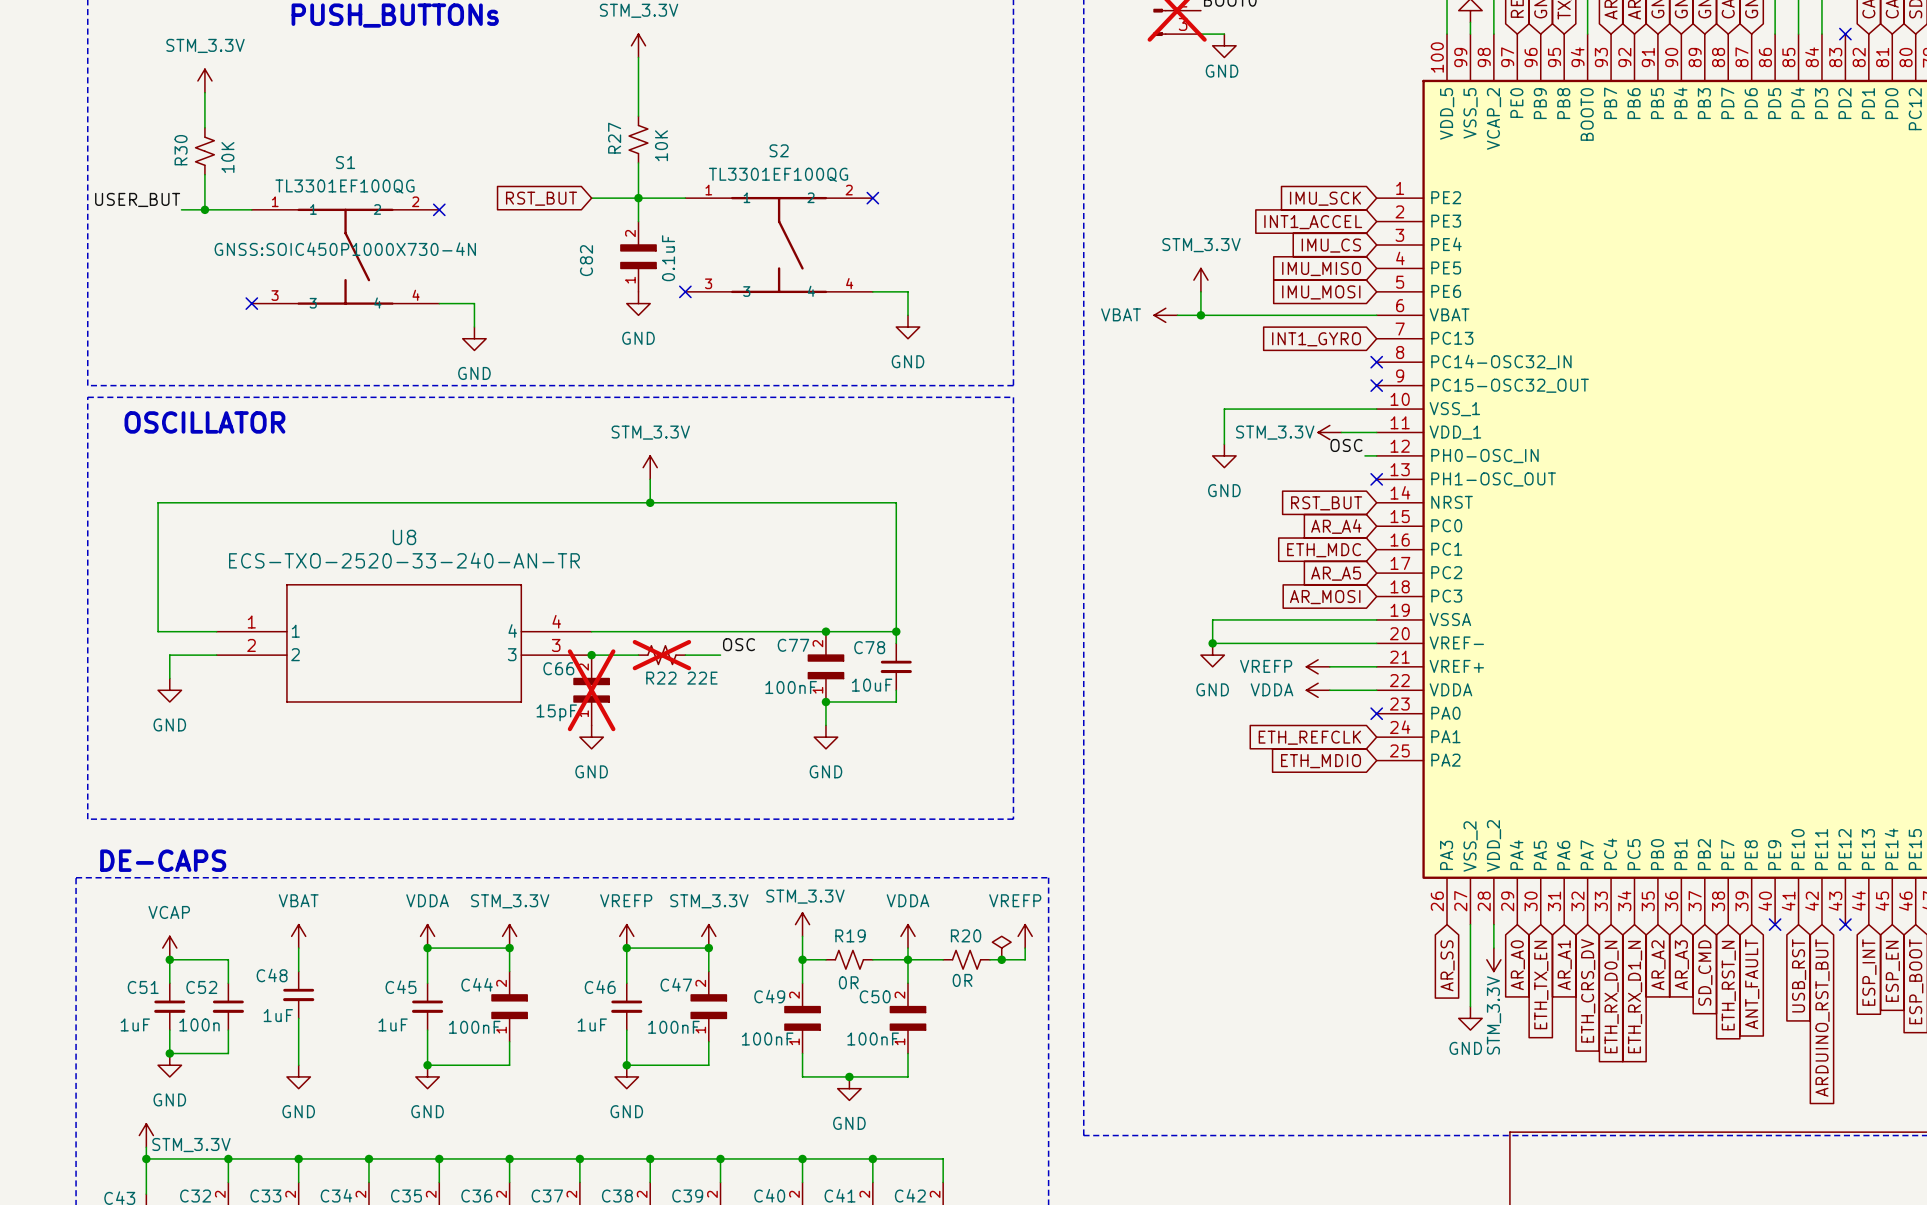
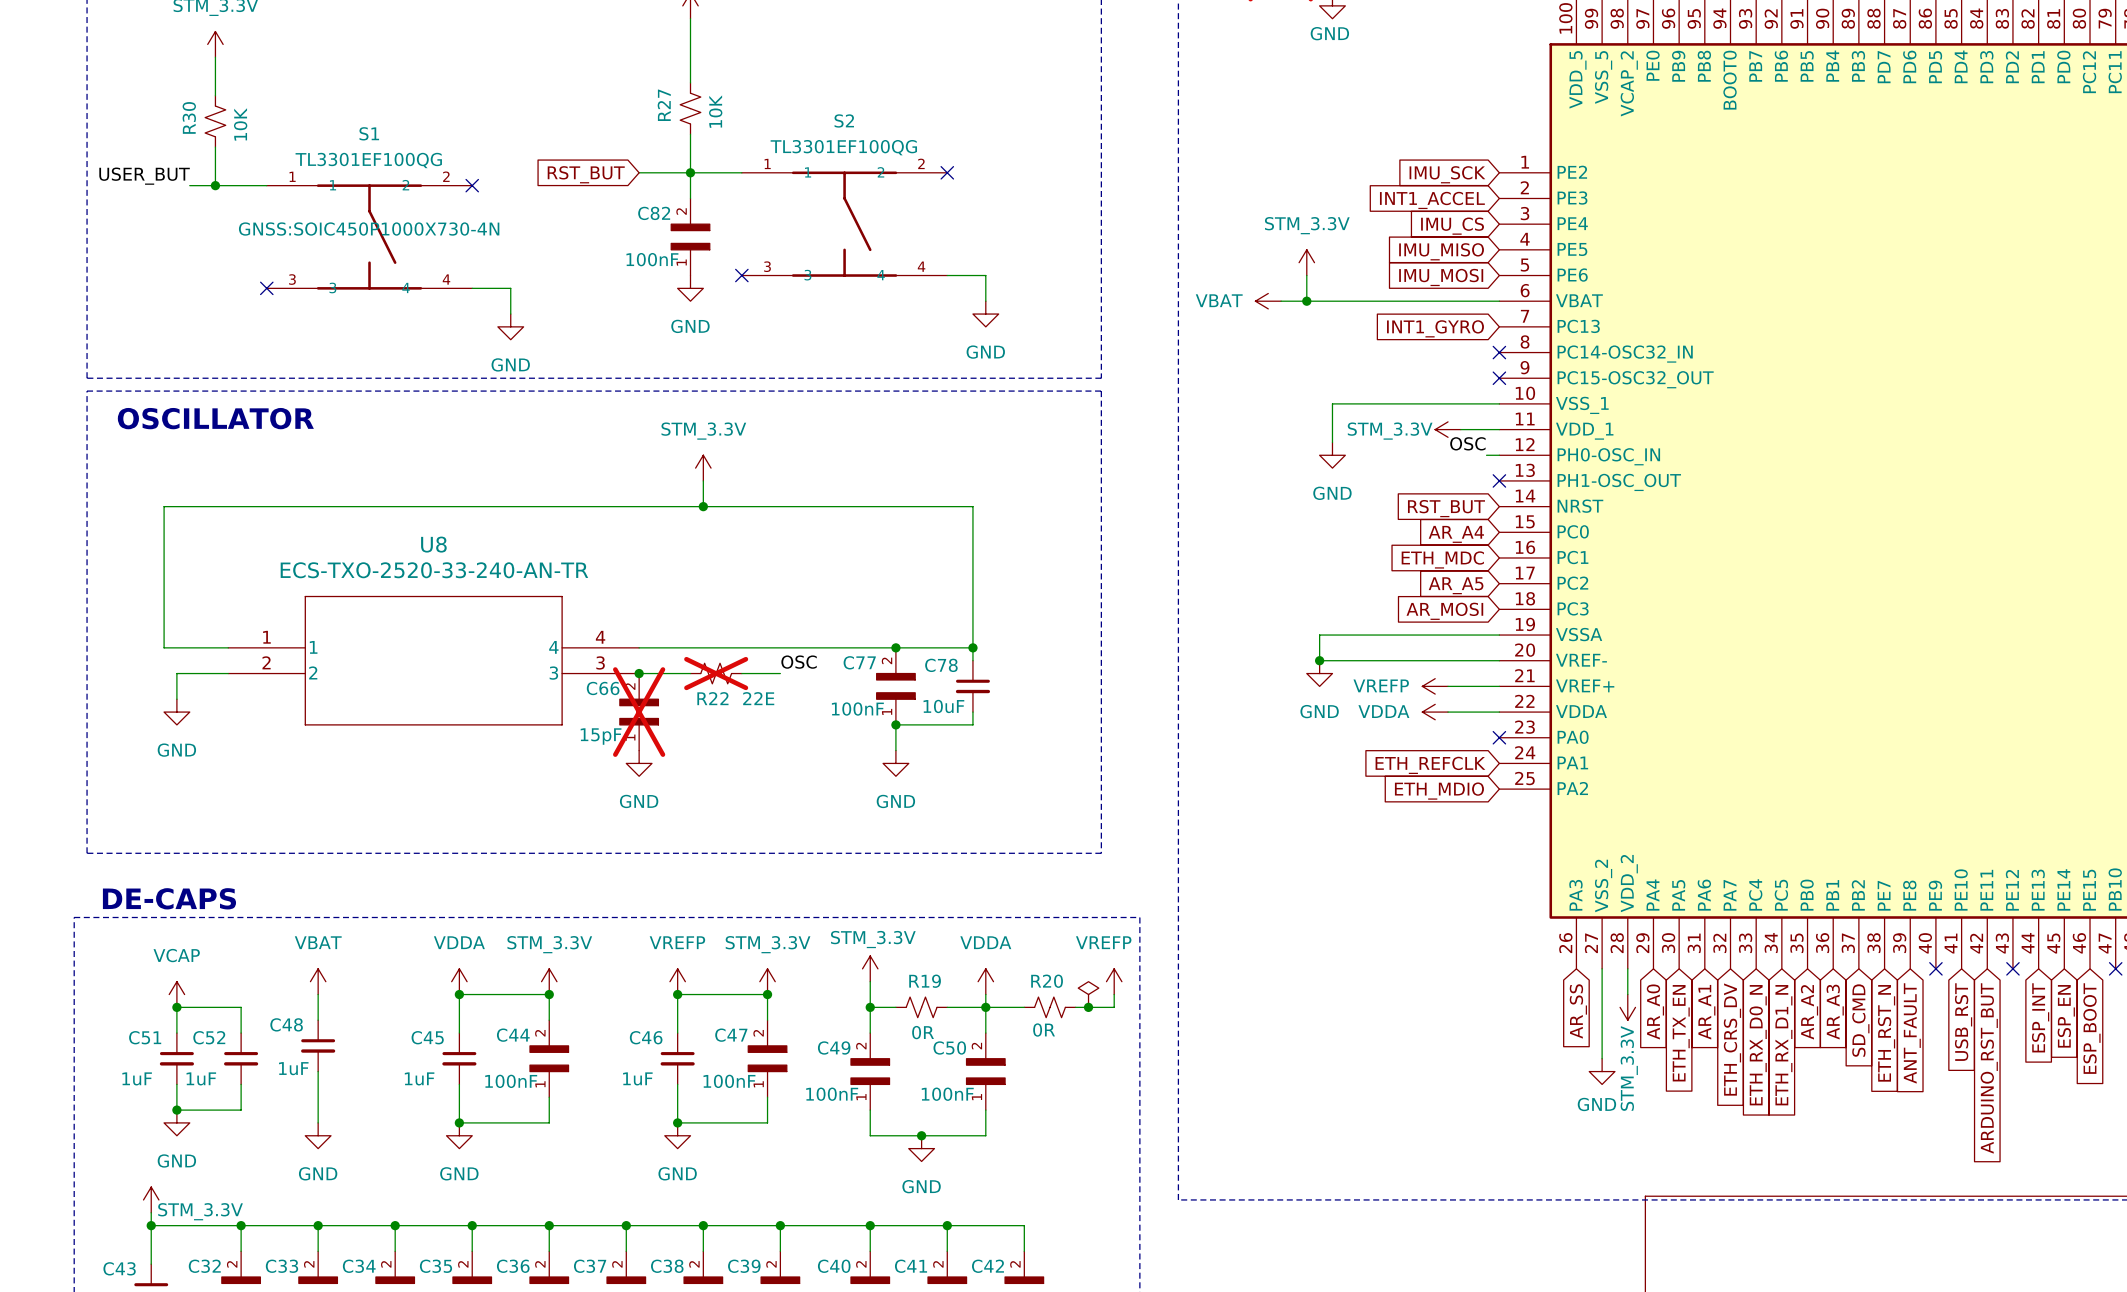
C82 value: 0.1uF (668, 258) -> 100nF (652, 259)
C82 name rotation: 0° (586, 260) -> 90° clockwise (654, 213)
C52 value: 100n (199, 1024) -> 1uF (201, 1078)

